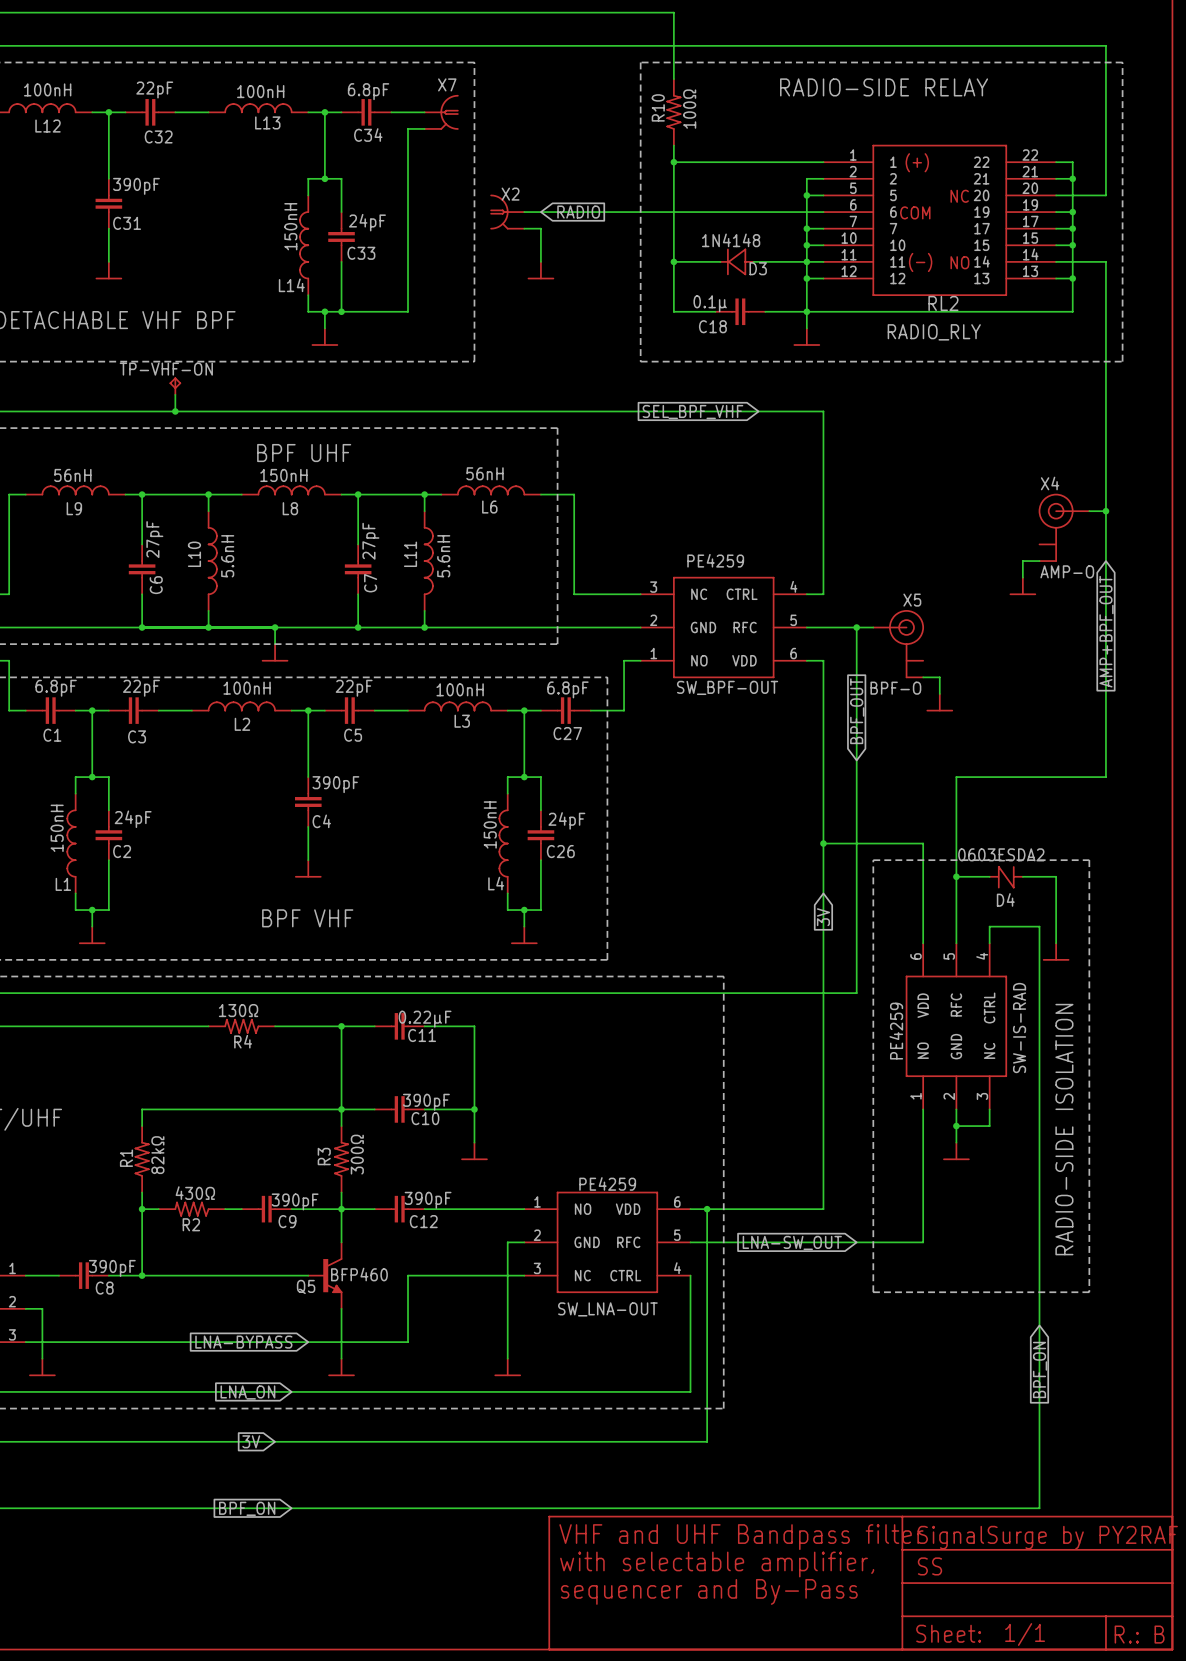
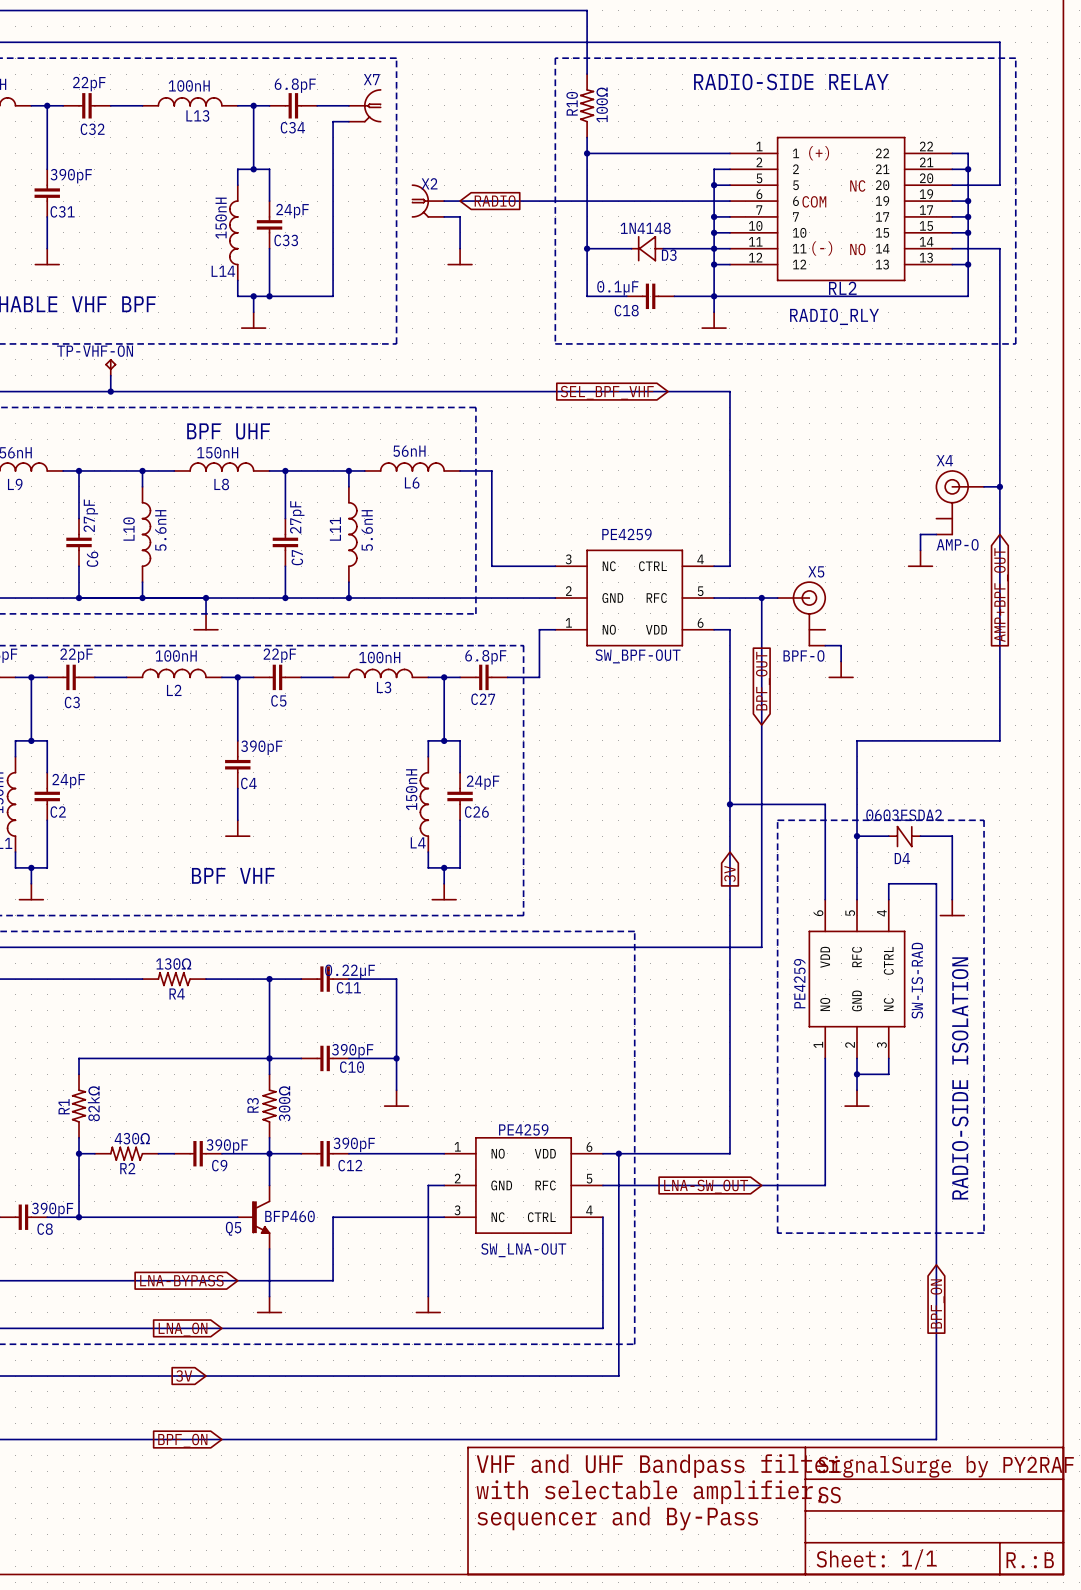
C18 value: 0.1µ (710, 303) -> 0.1µF (617, 288)

